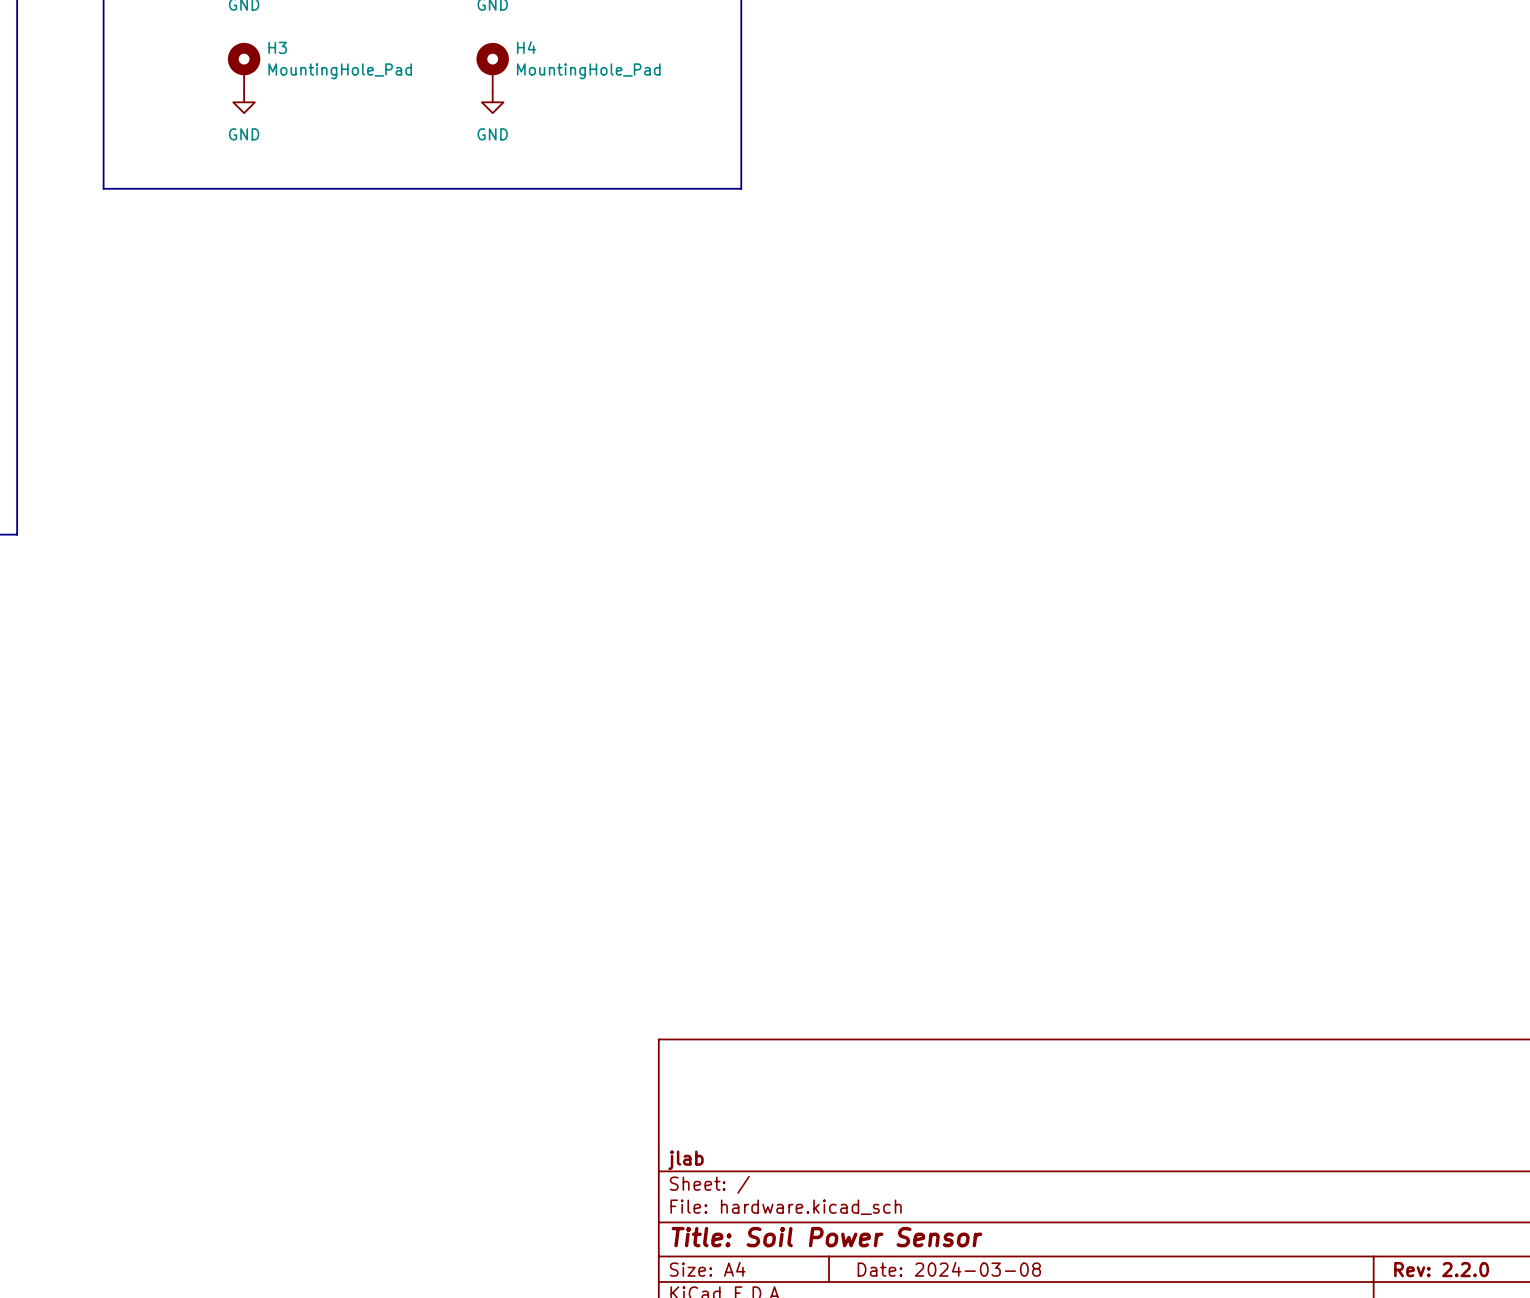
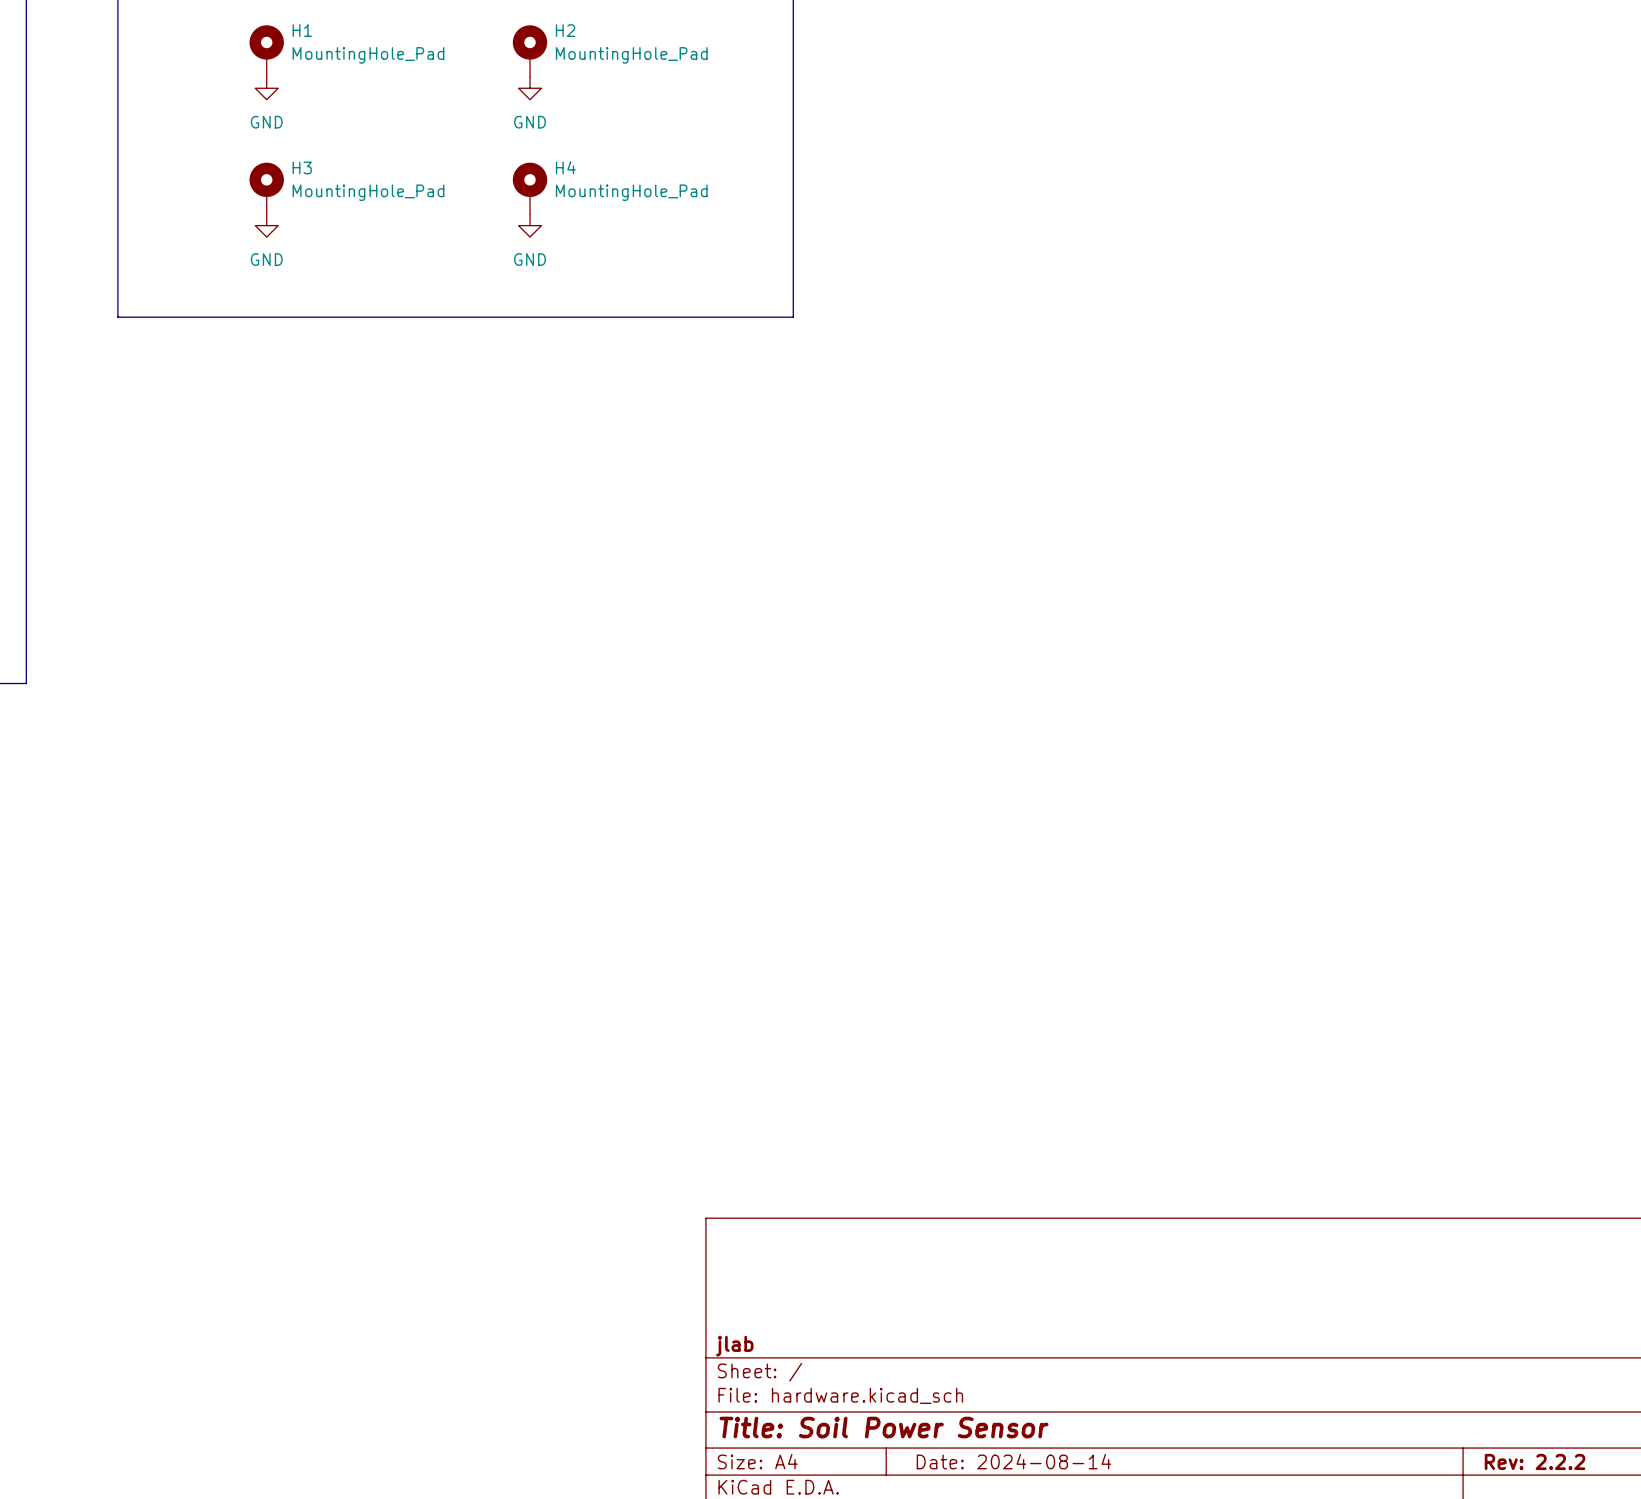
title block: Date: 2024-03-08 (949, 1269) -> Date: 2024-08-14 (1013, 1461)
title block: Rev: 2.2.0 (1441, 1269) -> Rev: 2.2.2 (1535, 1461)

